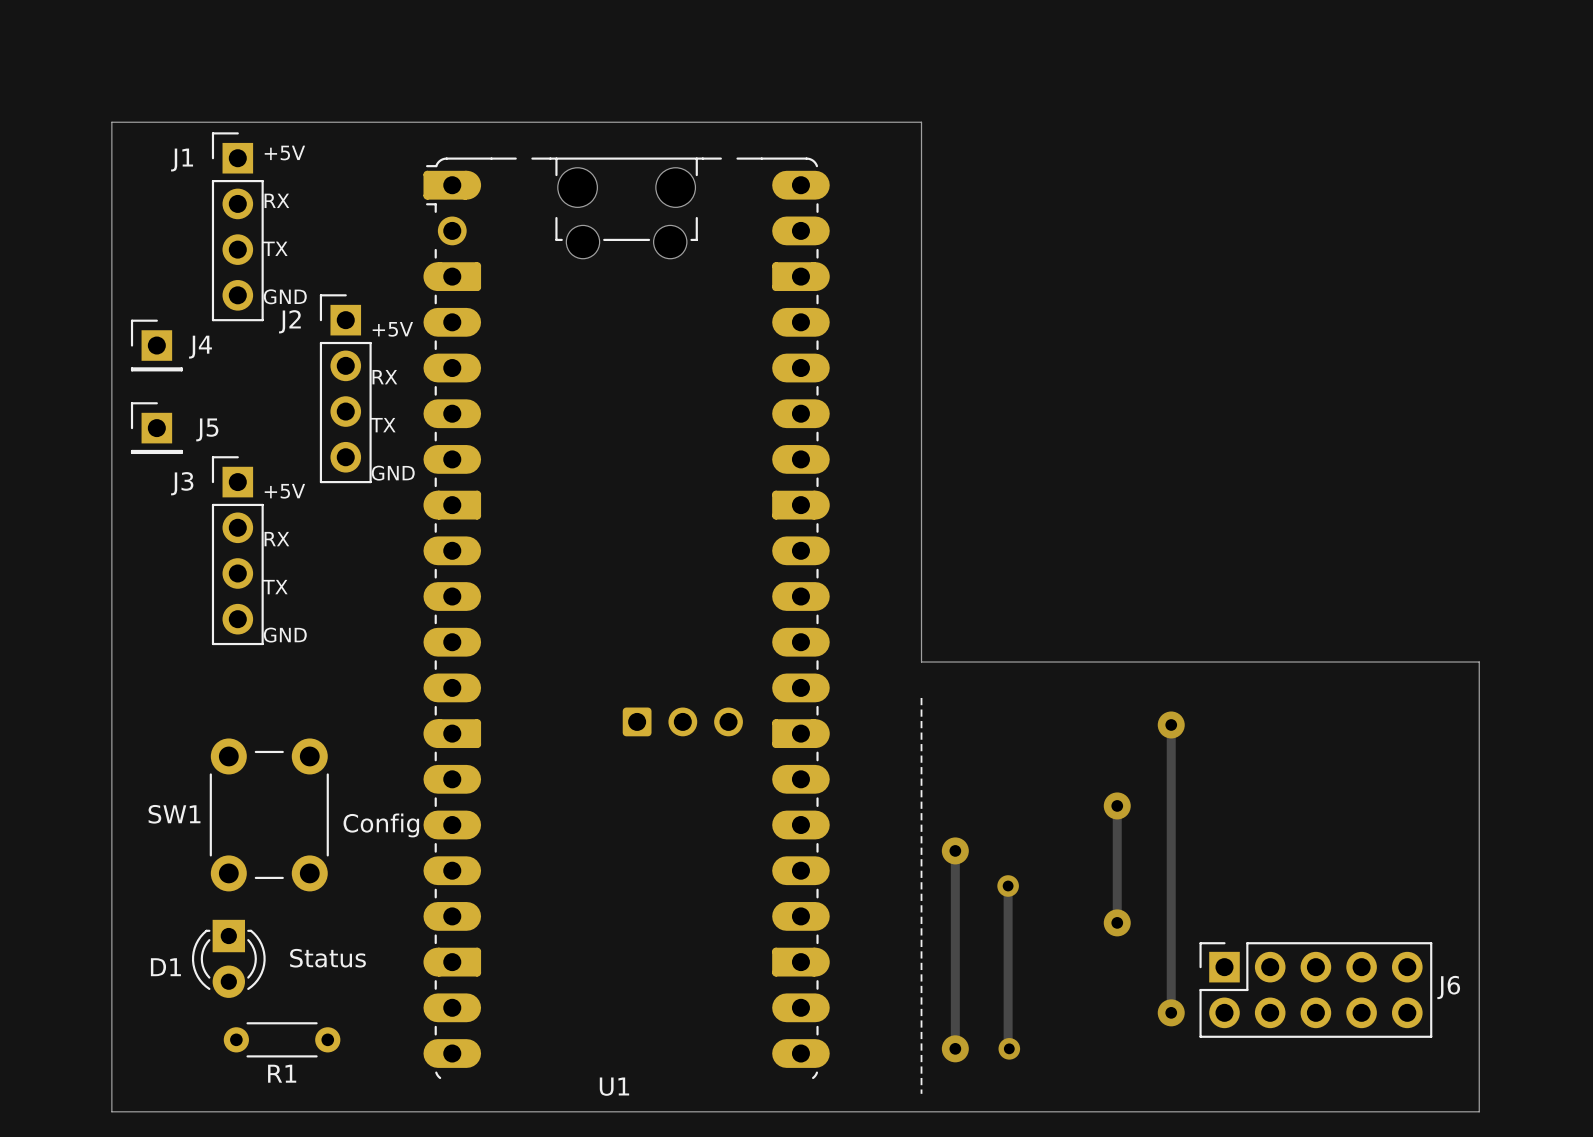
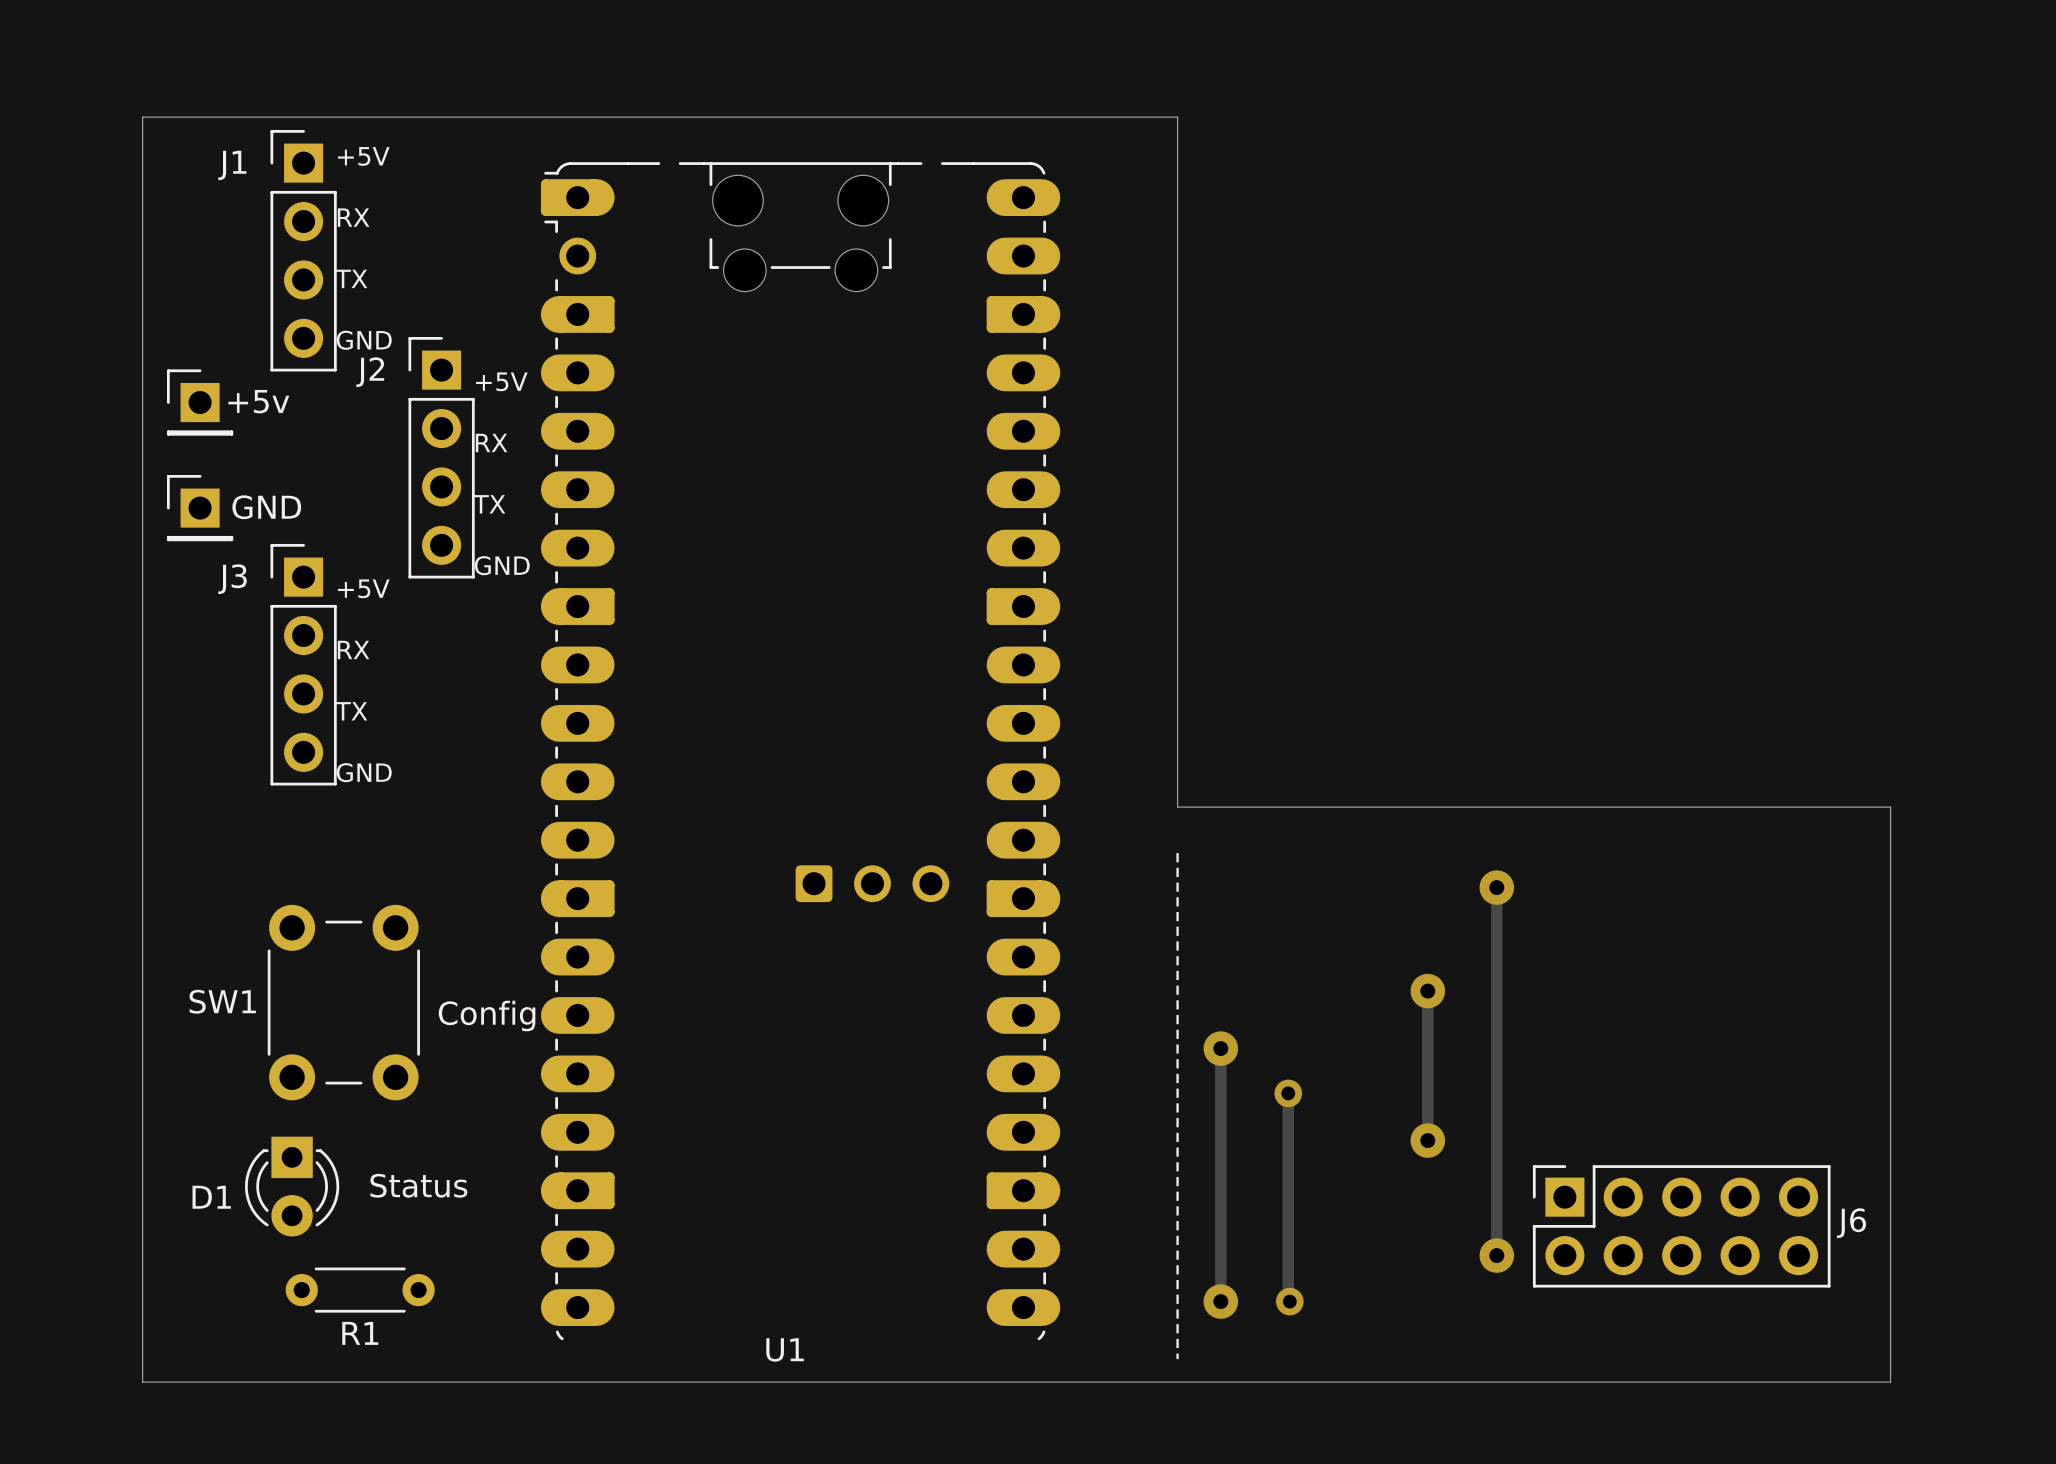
J4 name: J4 (200, 347) -> +5v (258, 401)
J5 name: J5 (207, 429) -> GND (266, 507)

